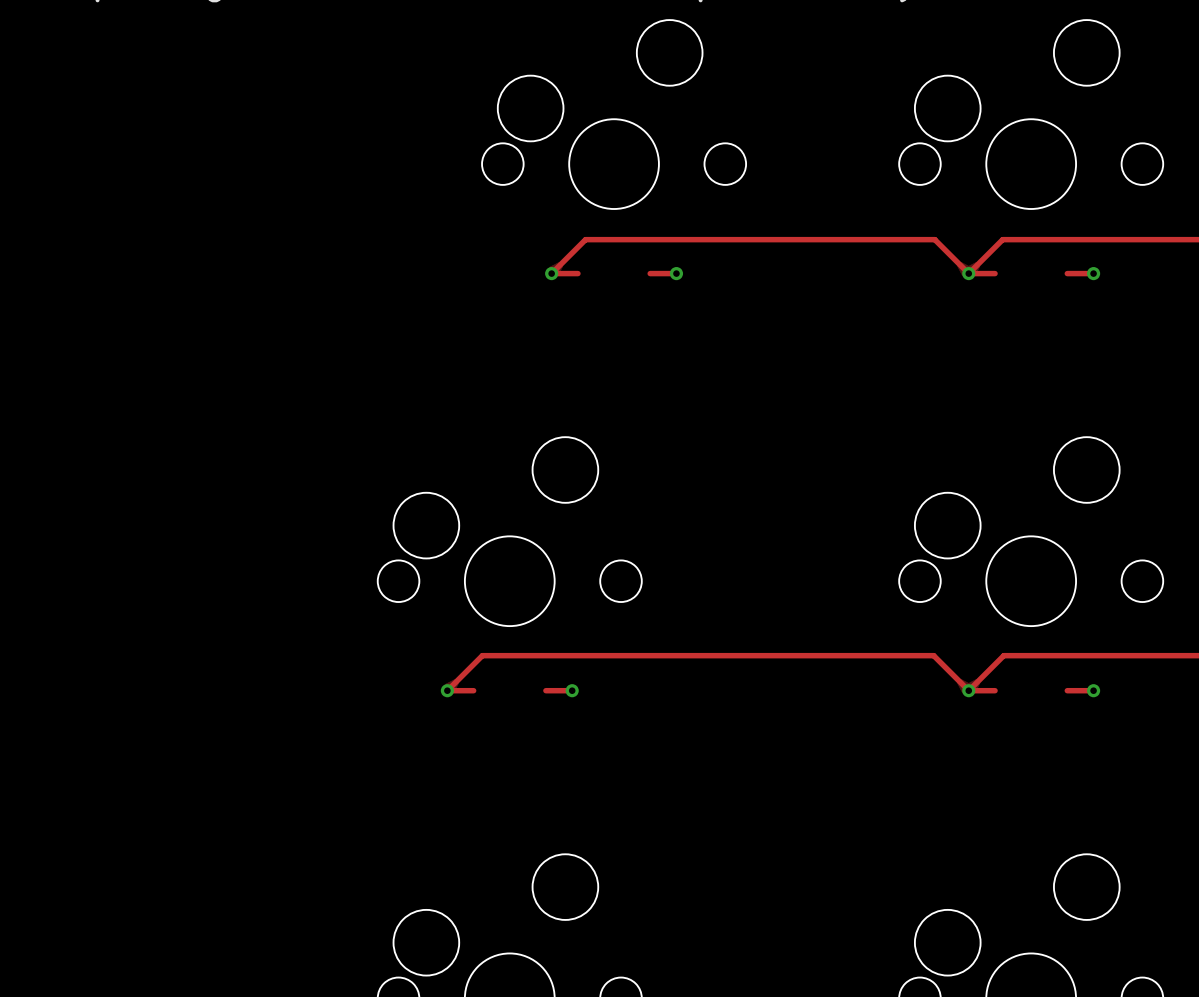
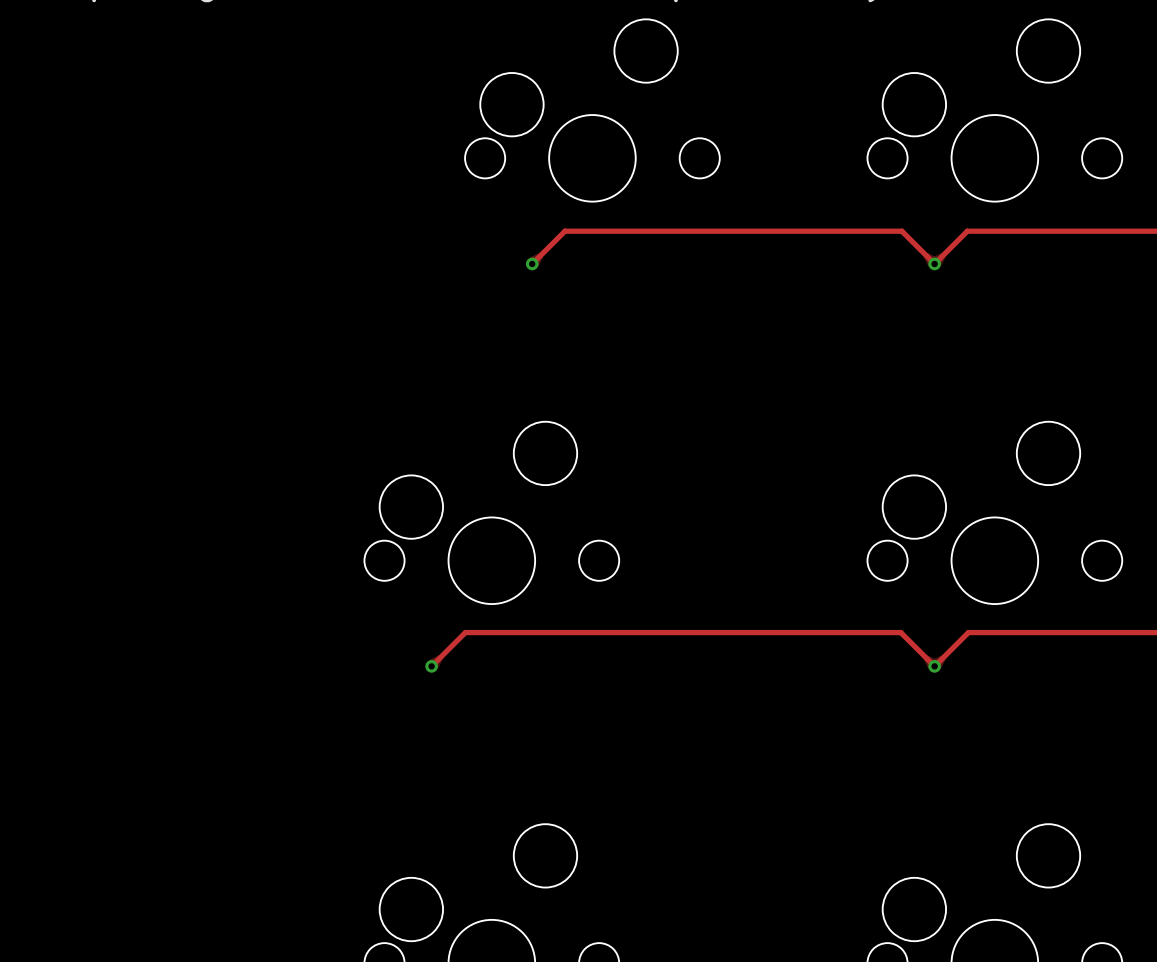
track: (551, 273) (577, 273) -> none
track: (650, 273) (676, 273) -> none
via: (676, 273) -> none
track: (968, 273) (995, 273) -> none
track: (1067, 273) (1093, 273) -> none
via: (1093, 273) -> none
track: (447, 690) (473, 690) -> none
track: (545, 690) (572, 690) -> none
via: (572, 690) -> none
track: (968, 690) (995, 690) -> none
track: (1067, 690) (1093, 690) -> none
via: (1093, 690) -> none

